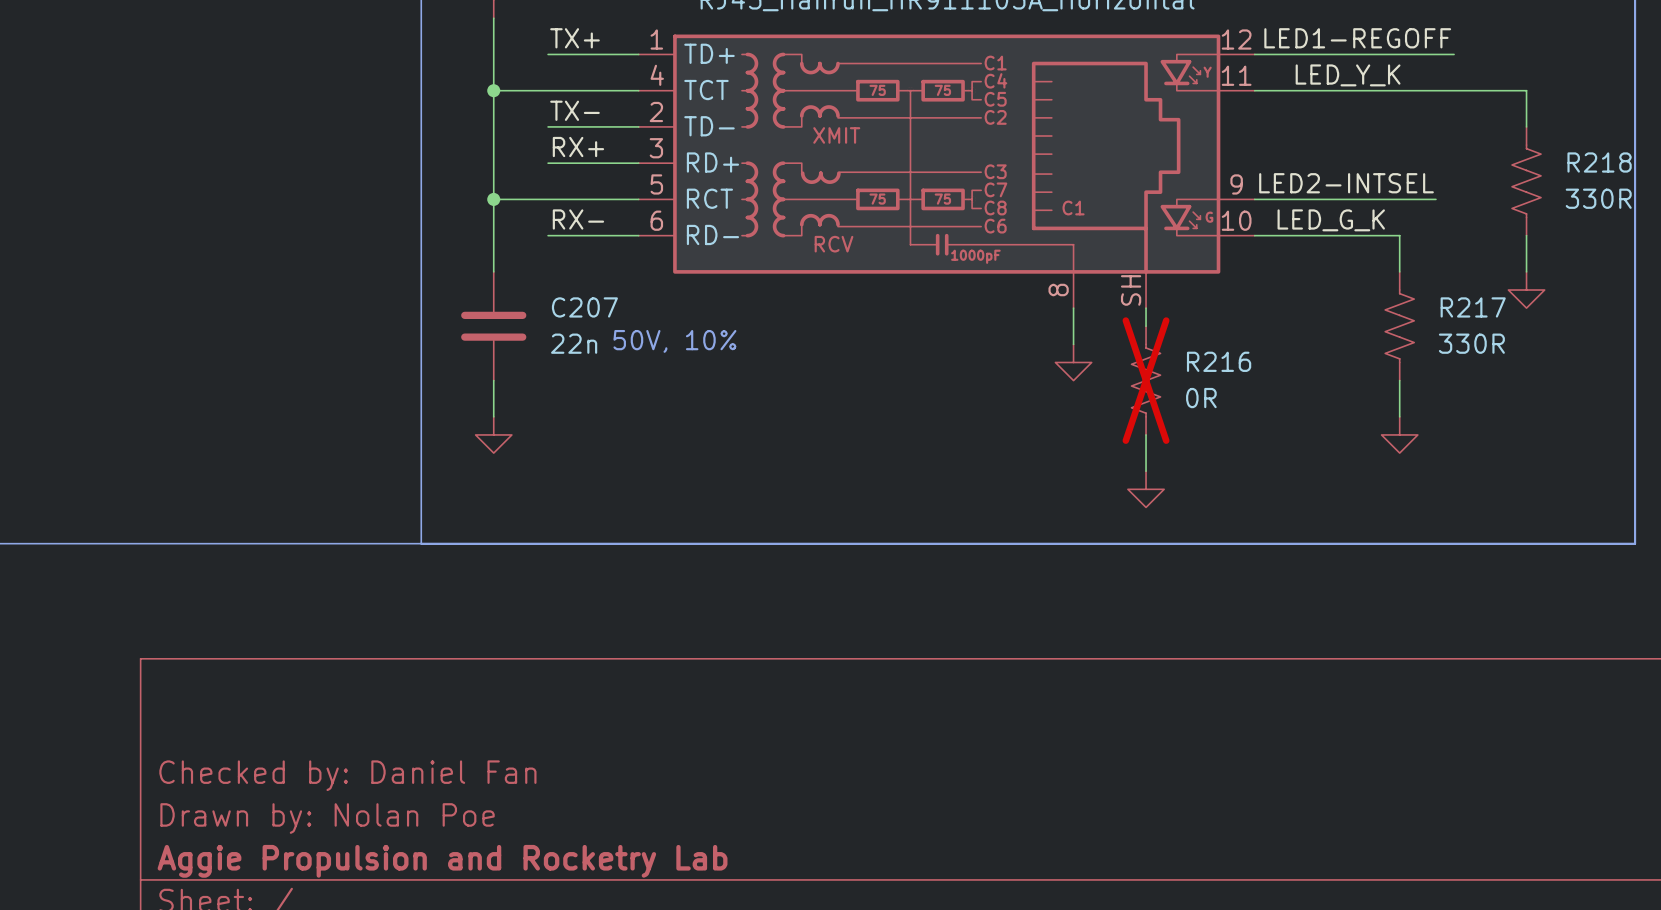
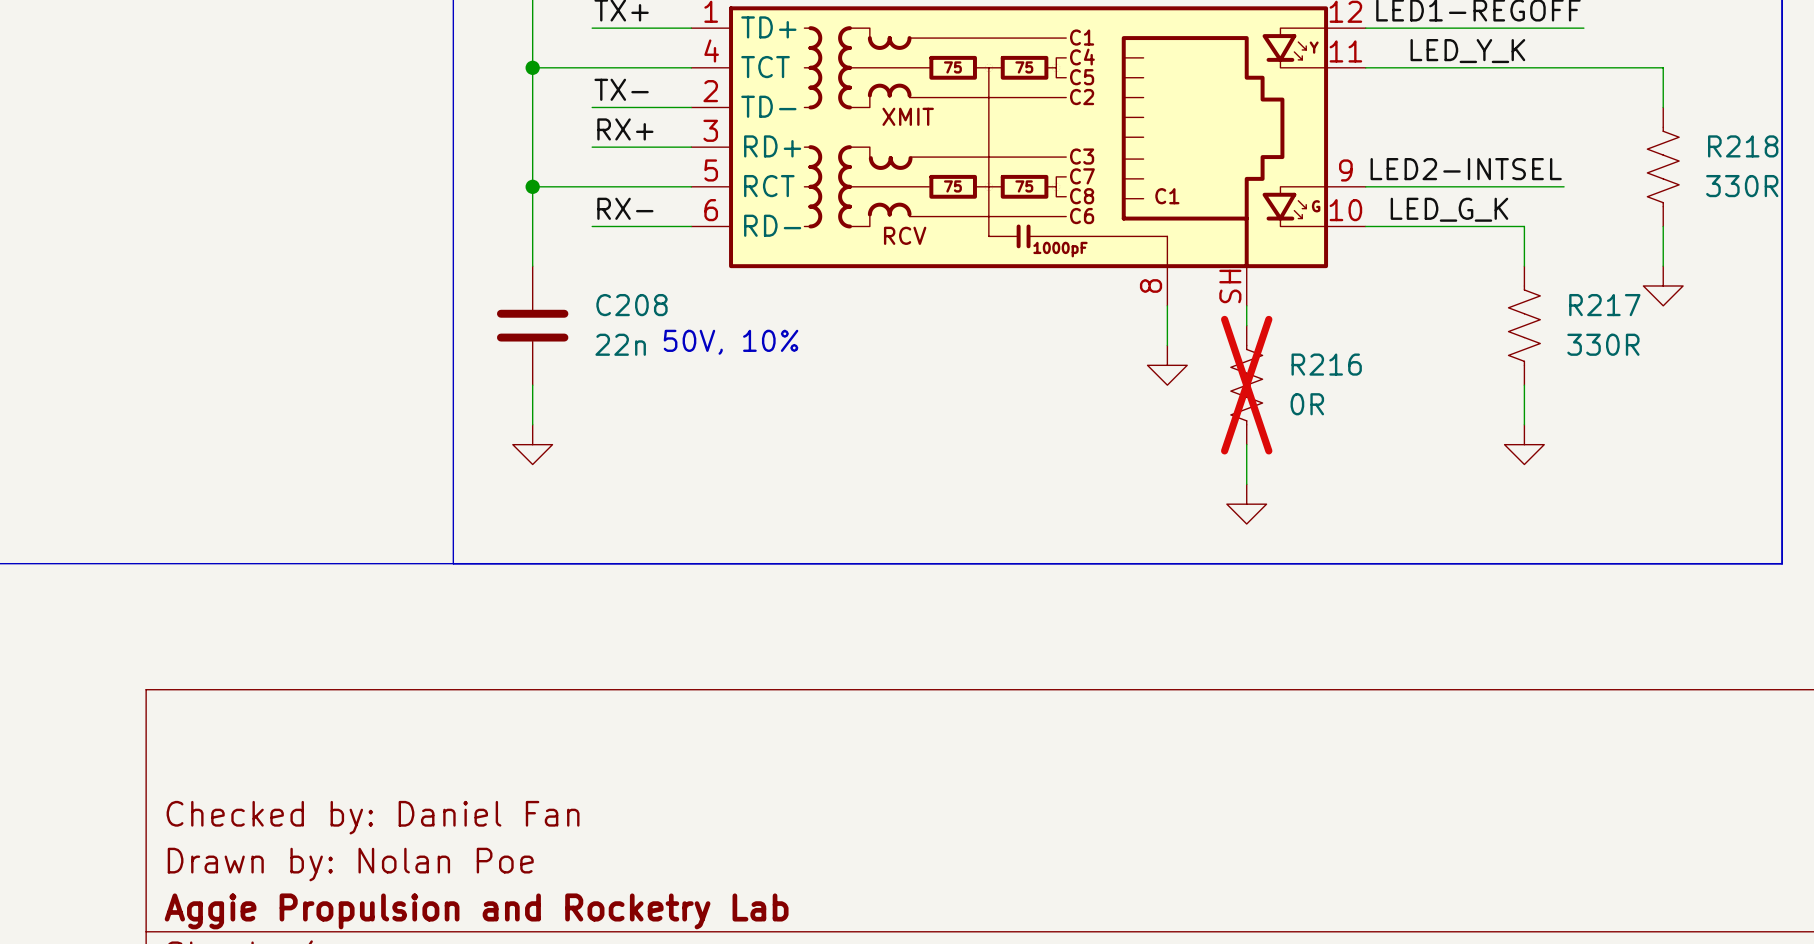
C207 name: C207 (584, 307) -> C208 (631, 305)

